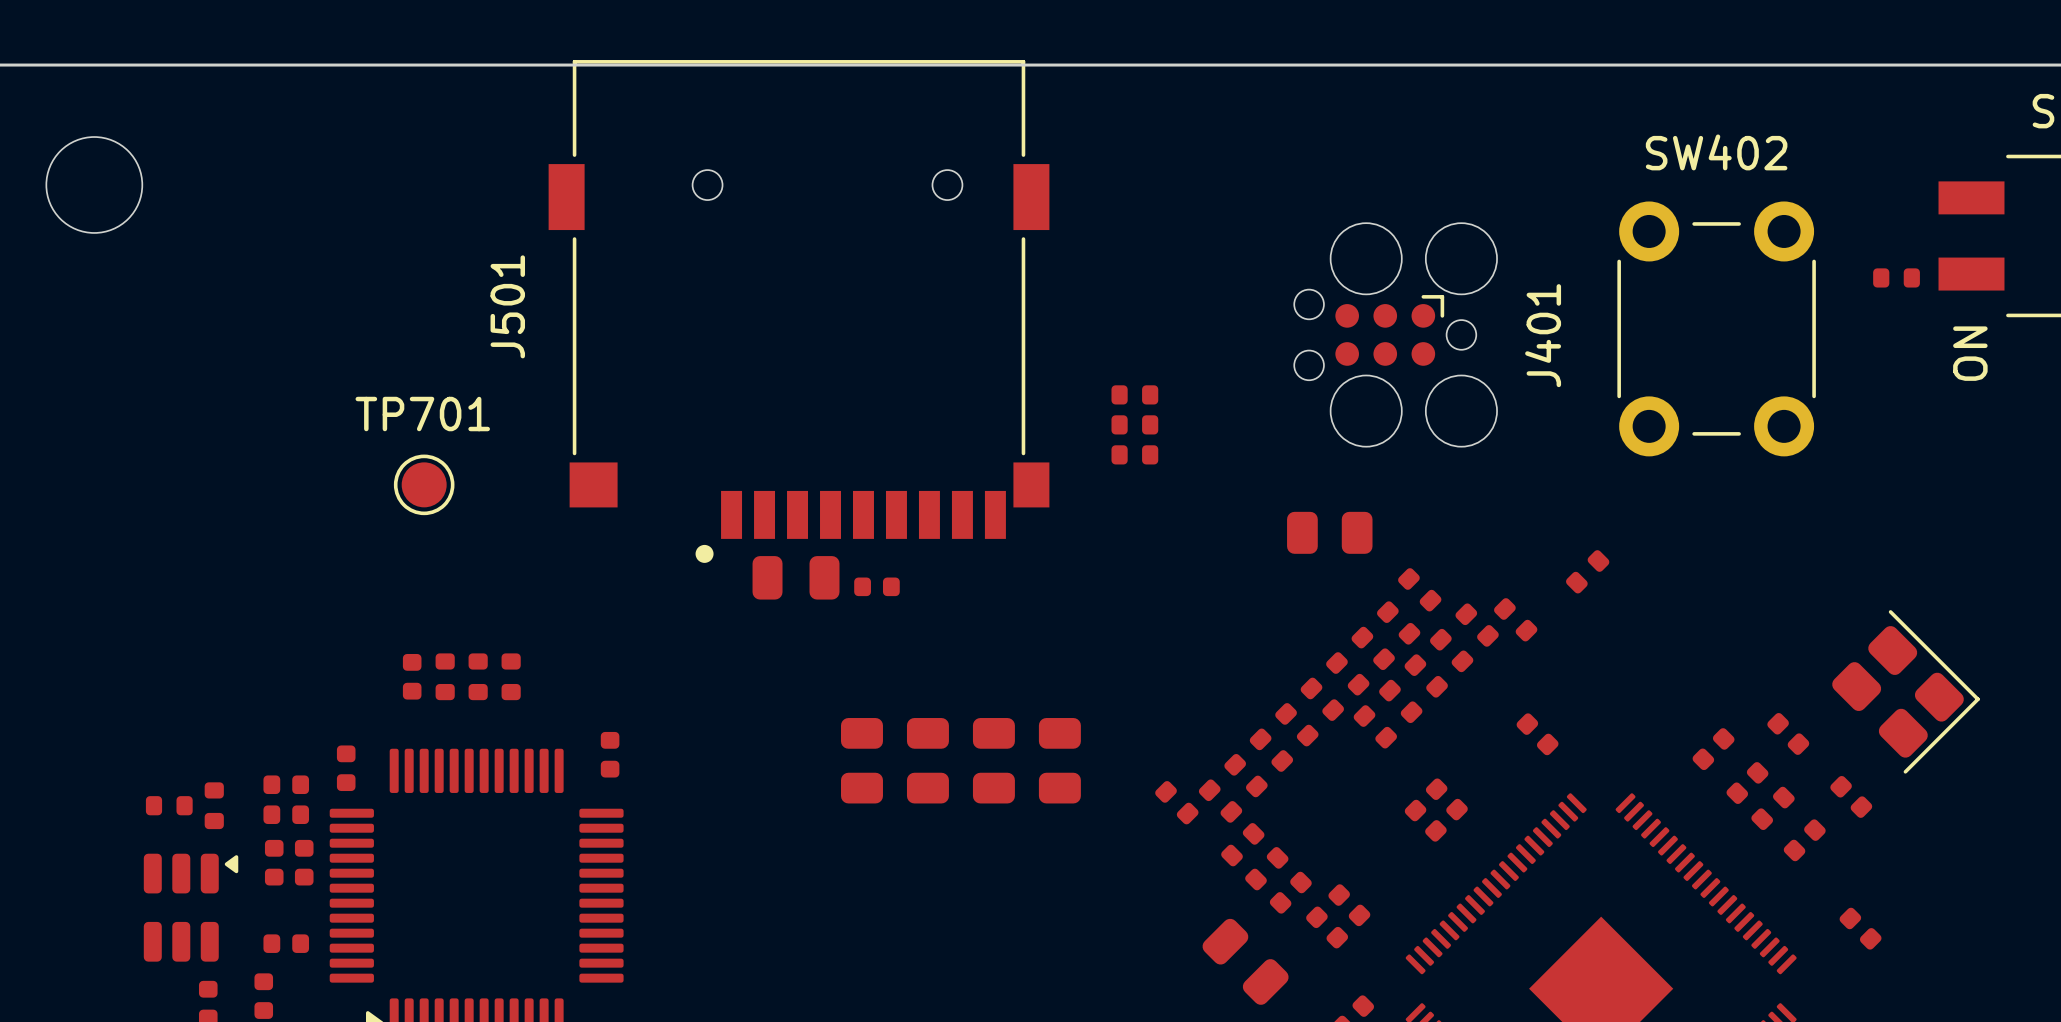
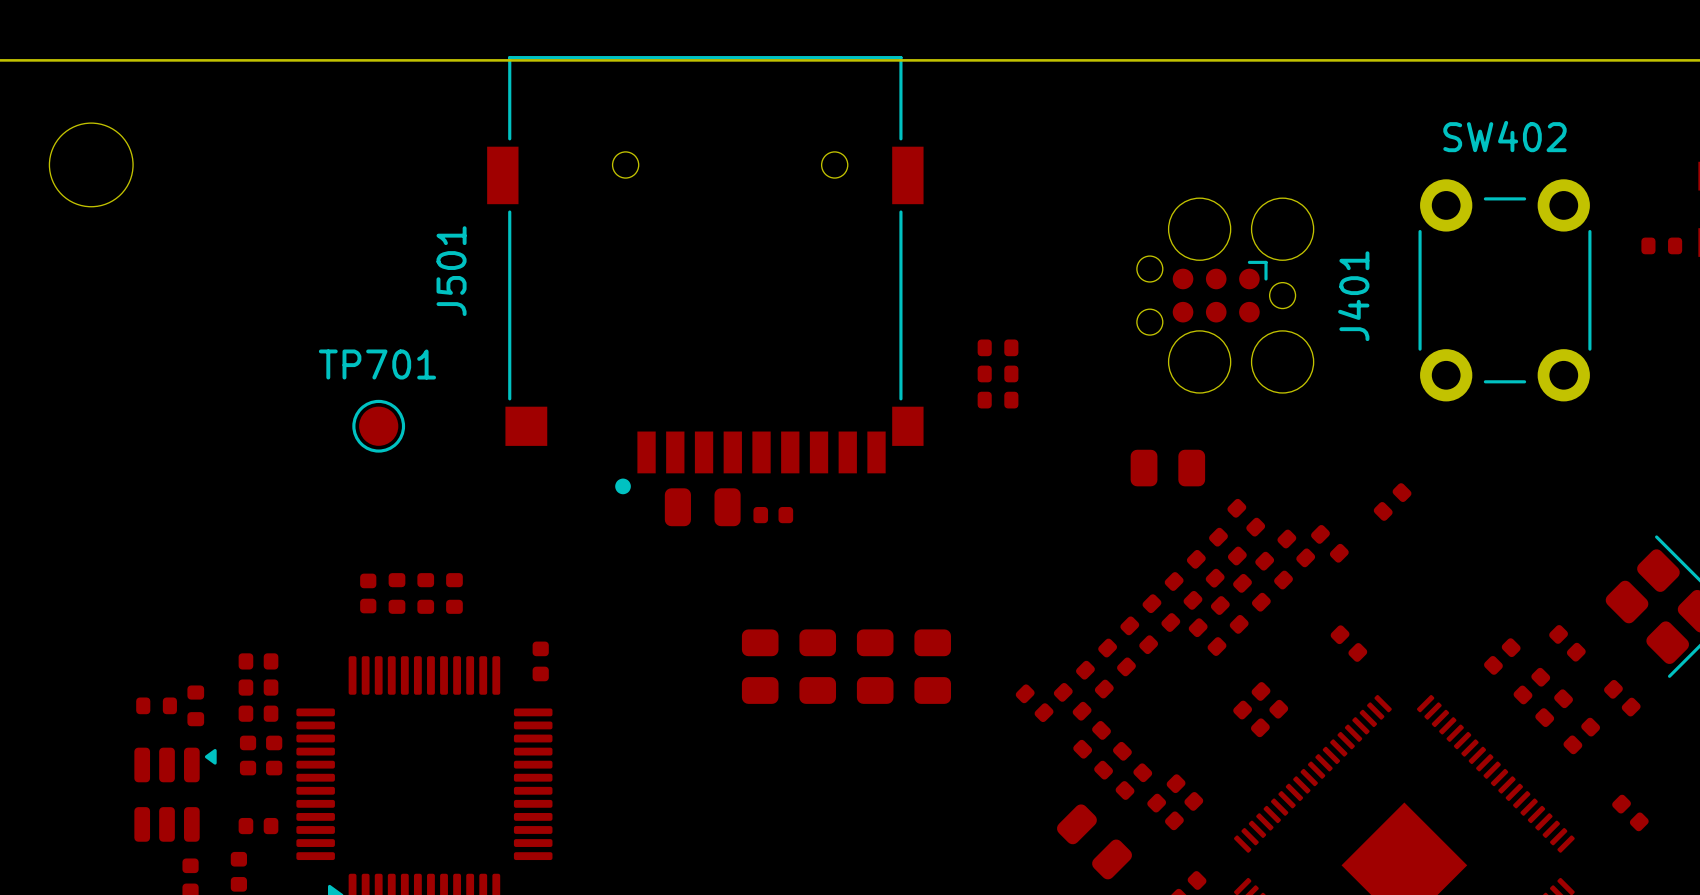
part rotation: 0° (346, 768) -> 90° clockwise (258, 661)
part position: (346, 768) -> (258, 661)

